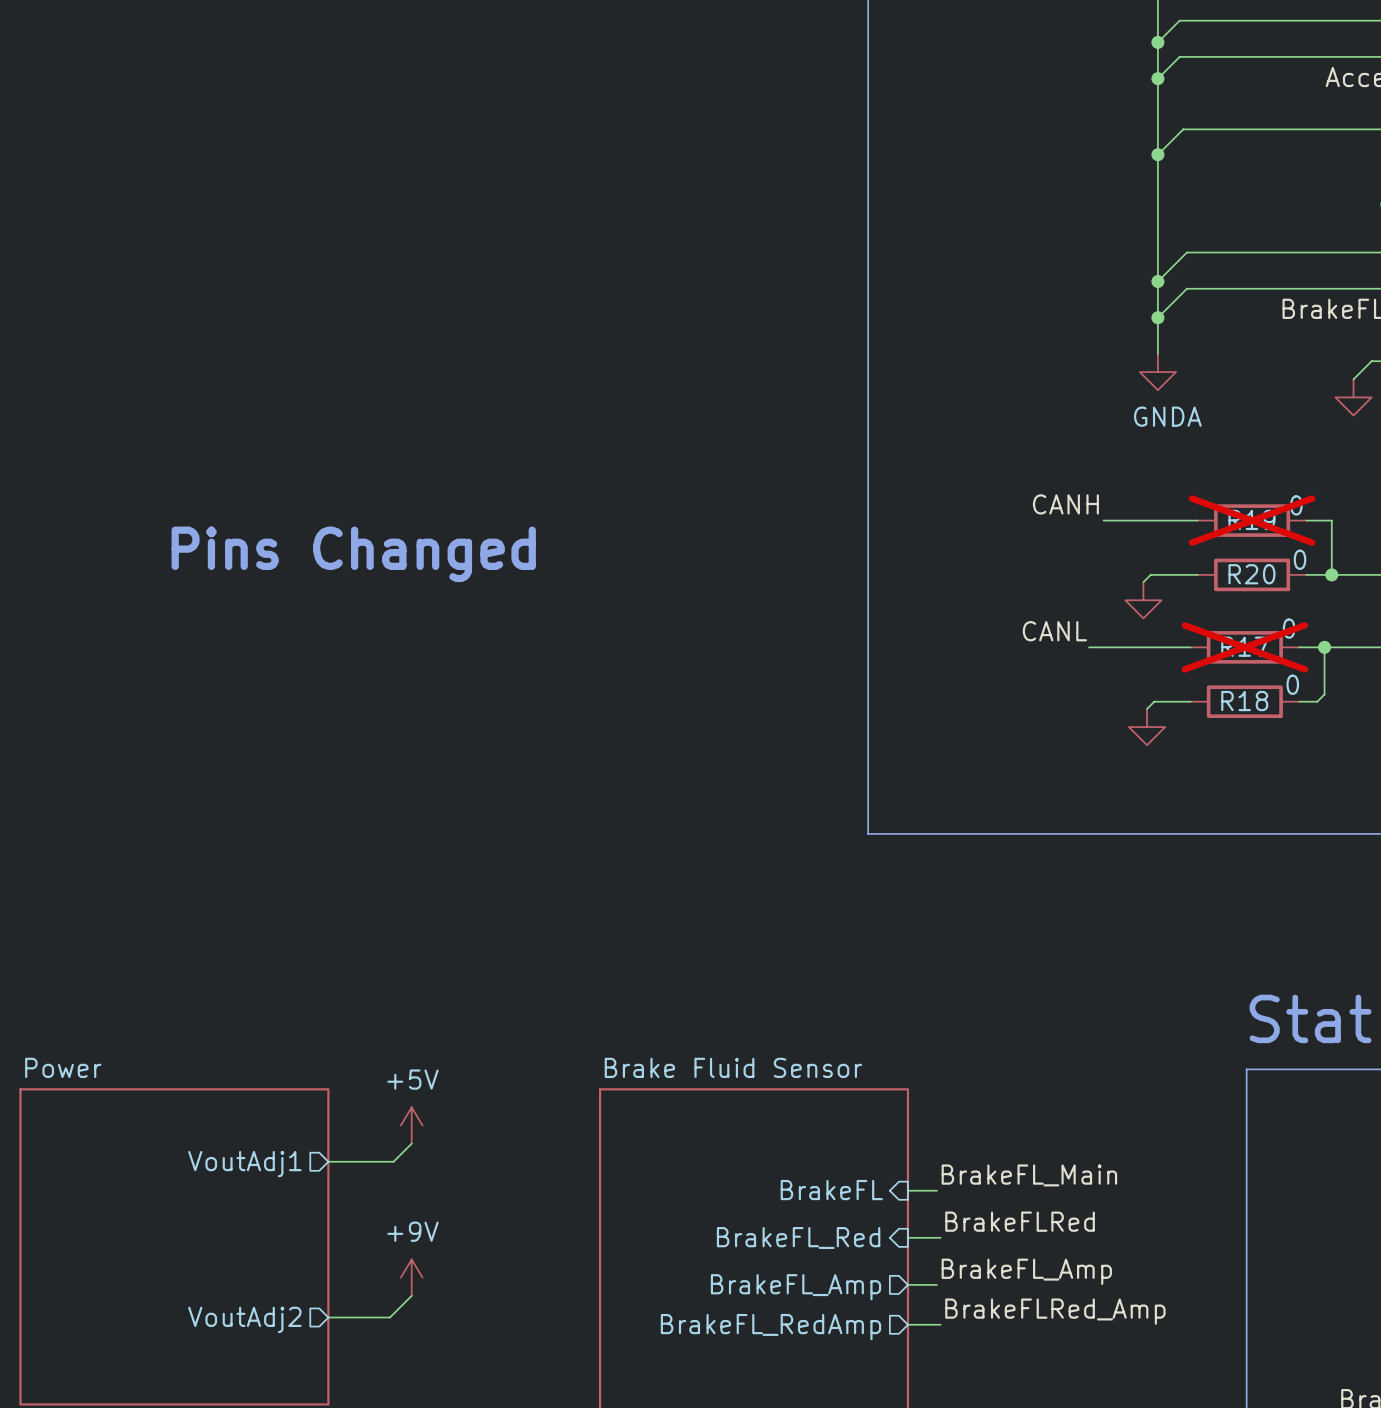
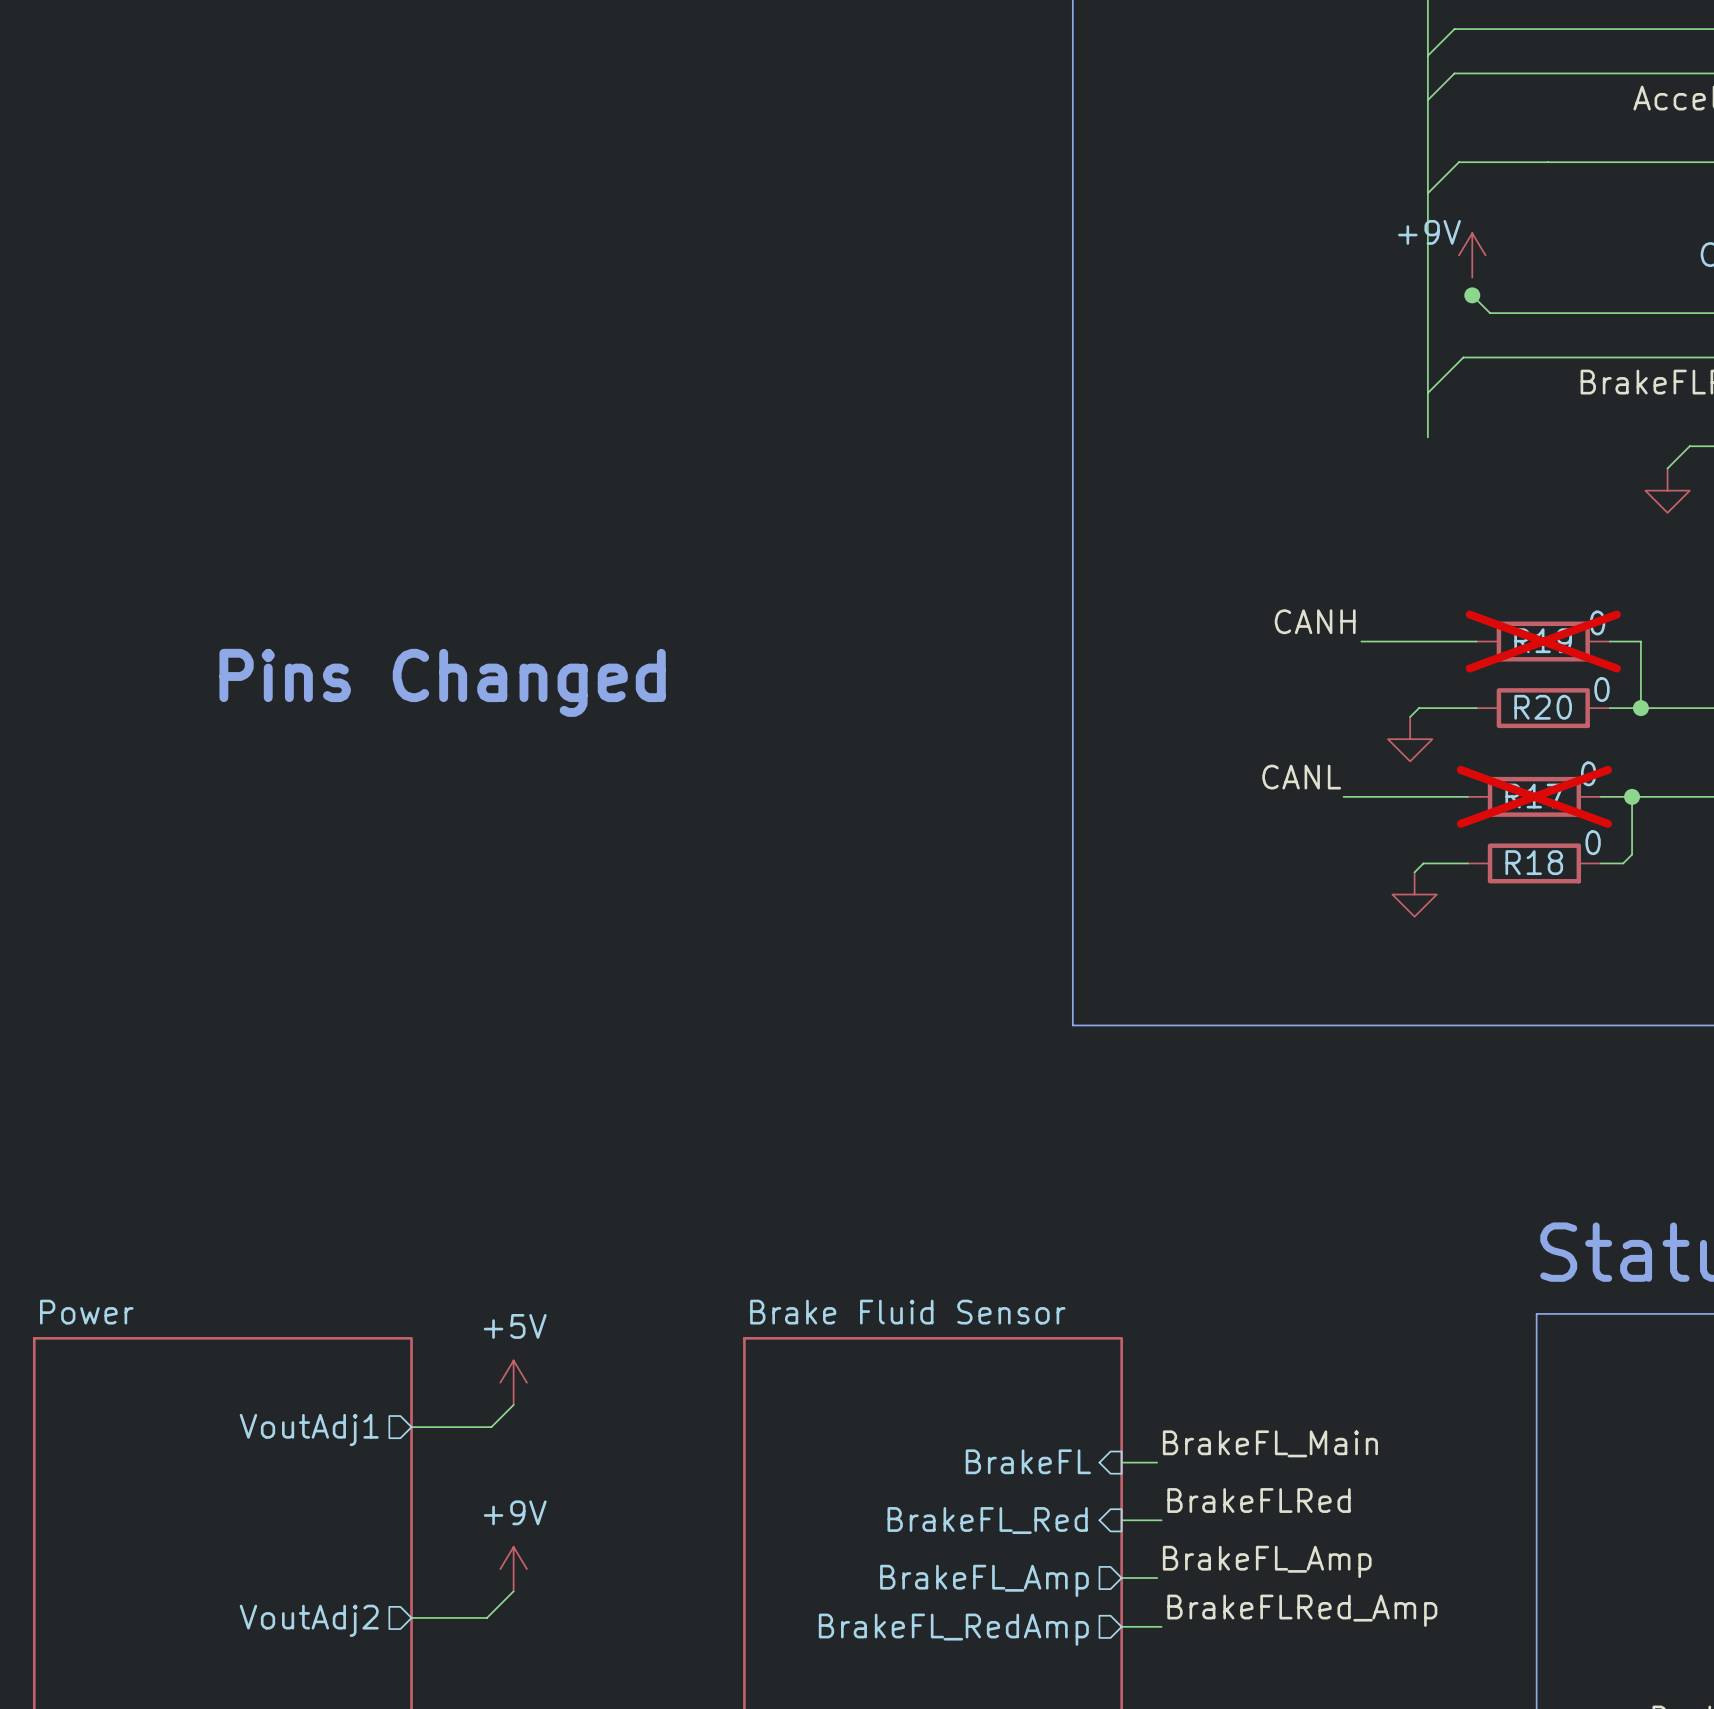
junction: (1157, 42) -> none
junction: (1157, 78) -> none
junction: (1157, 154) -> none
power symbol: none -> +9V (1472, 255)
junction: none -> (1472, 295)
wire: (1208, 252) (1186, 252) (1157, 281) -> (1490, 313) (1472, 295)
junction: (1157, 281) -> none
junction: (1157, 317) -> none
power symbol: GNDA (1157, 372) -> none

